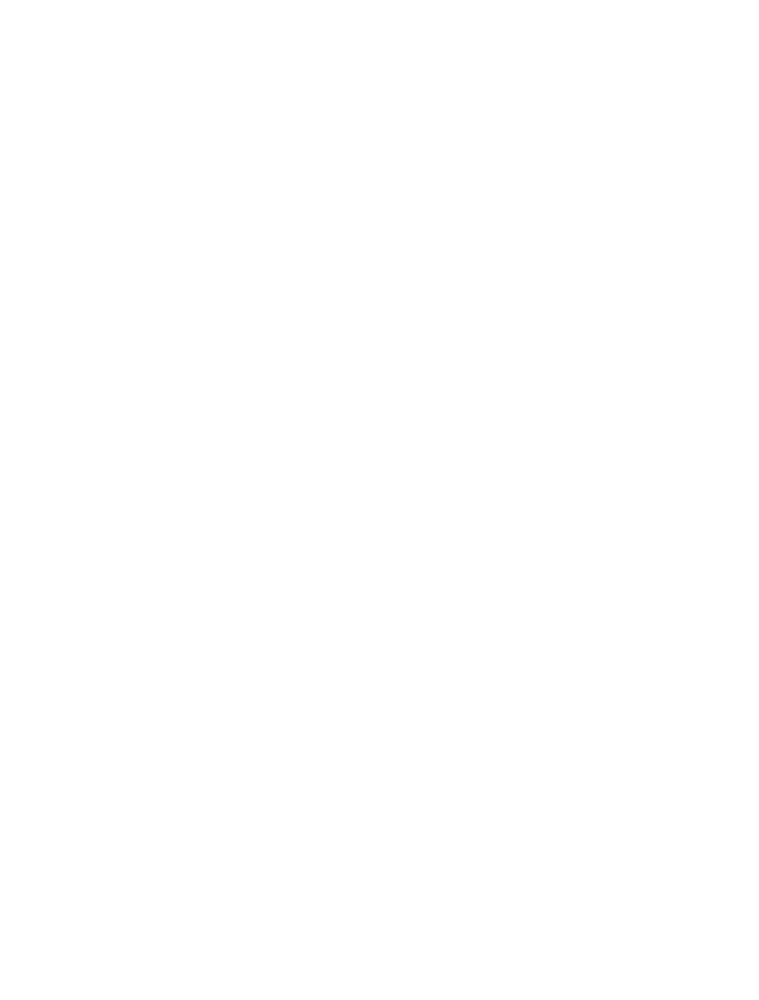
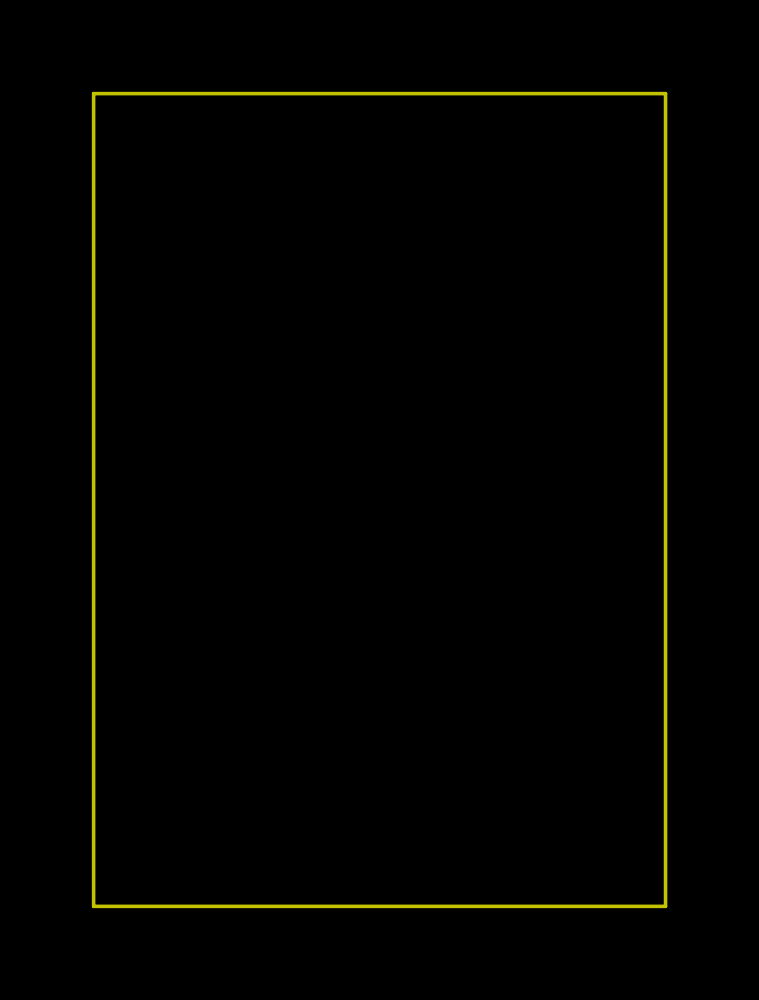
board edge: none -> (665, 93) (665, 906) (93, 906) (93, 93) (665, 93)

